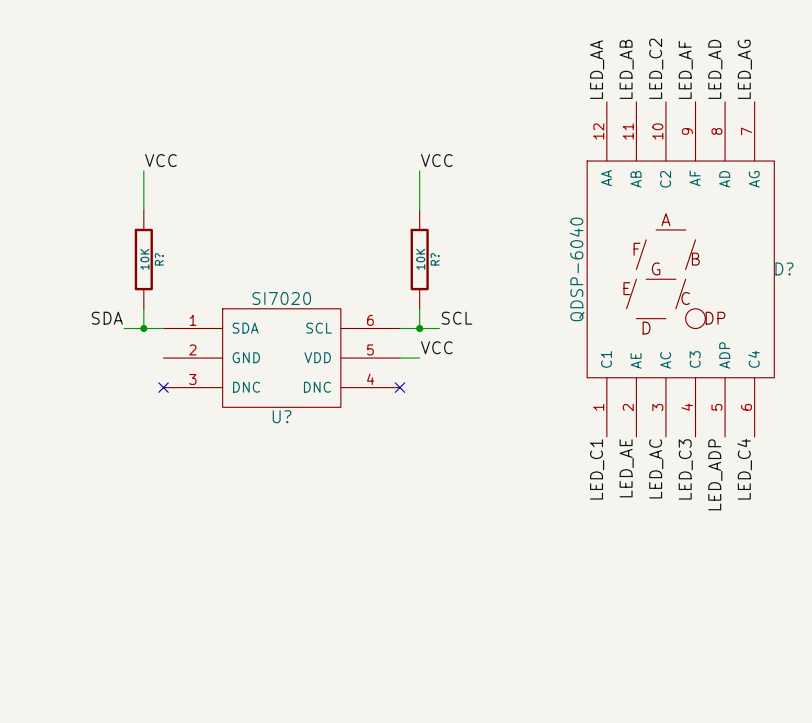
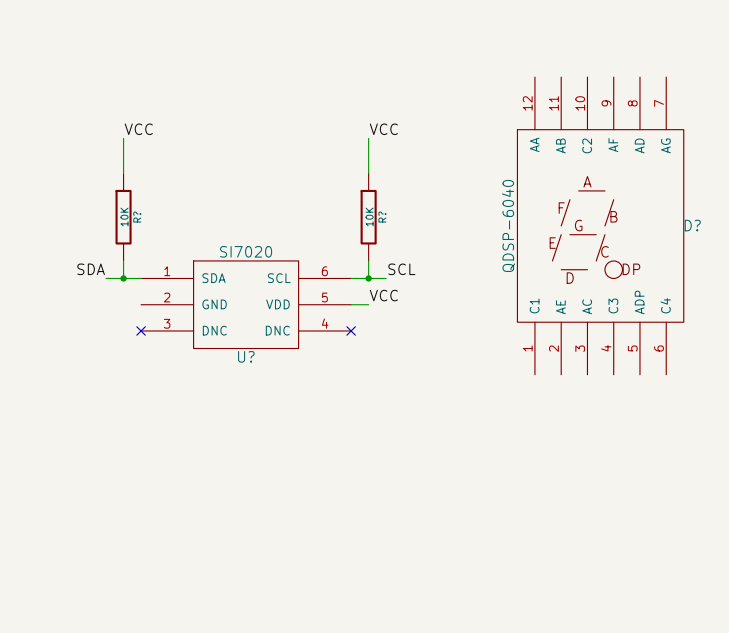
label: LED_C2 (656, 68) -> none
label: LED_AA (597, 69) -> none
label: LED_AB (626, 69) -> none
label: LED_AF (685, 69) -> none
label: LED_AD (715, 69) -> none
label: LED_AG (744, 69) -> none
label: LED_AE (626, 468) -> none
label: LED_AC (656, 468) -> none
label: LED_C1 (597, 469) -> none
label: LED_C3 (685, 469) -> none
label: LED_C4 (744, 469) -> none
label: LED_ADP (715, 474) -> none

